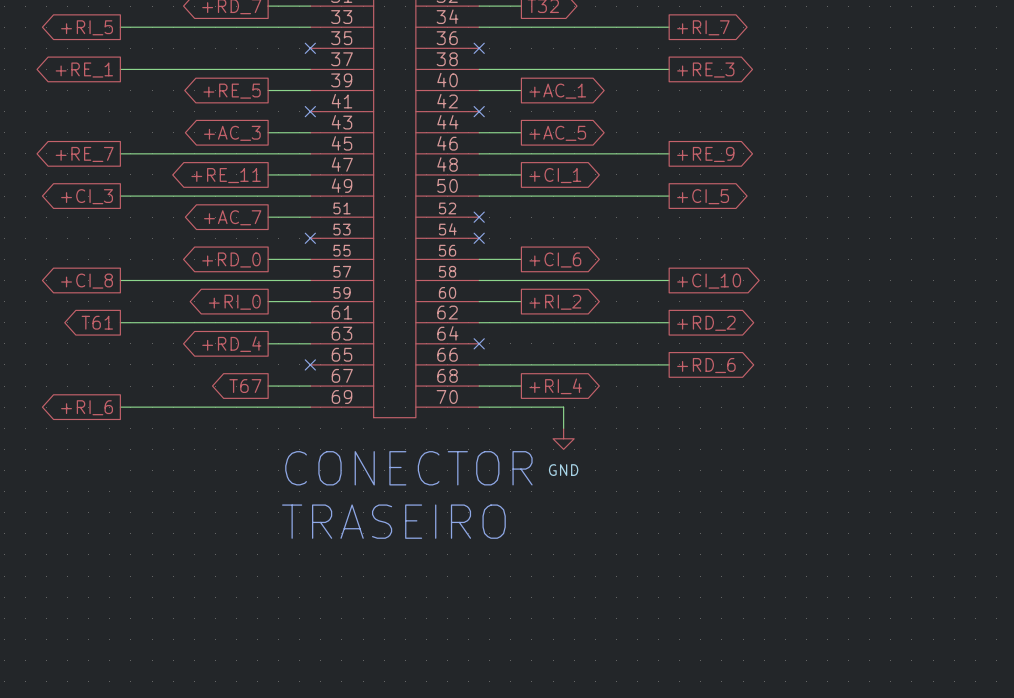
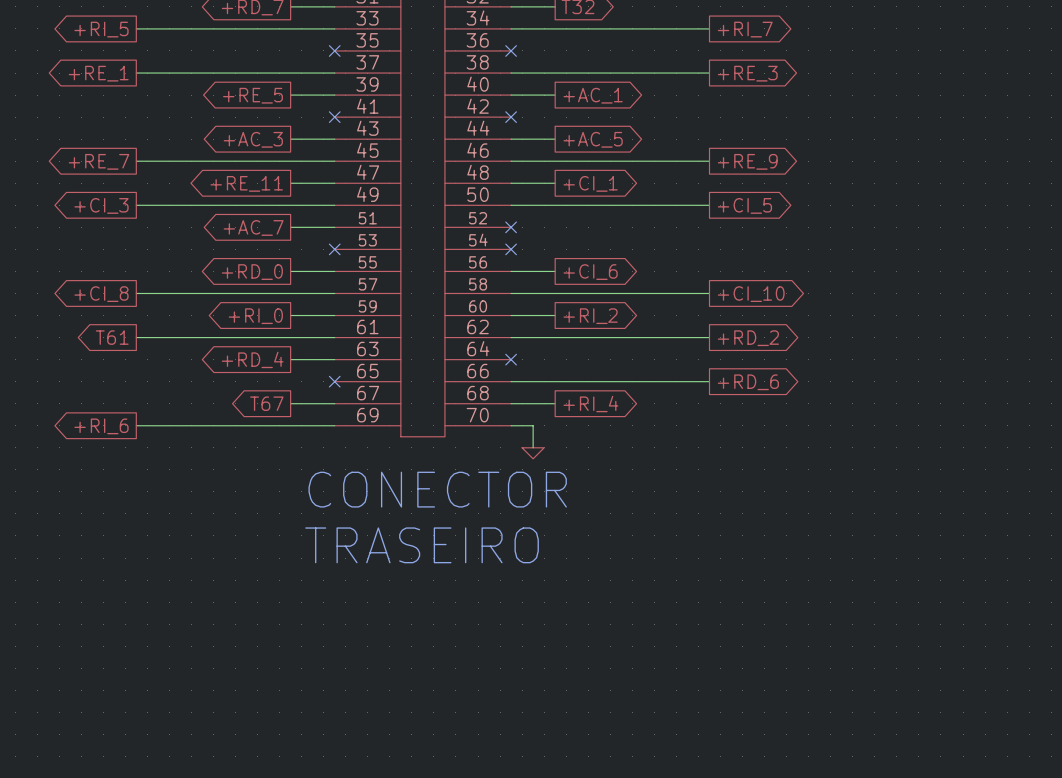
wire: (500, 407) (563, 407) (563, 428) -> (533, 425) (533, 447)
power symbol: none -> (533, 453)
power symbol: GND (563, 438) -> none

